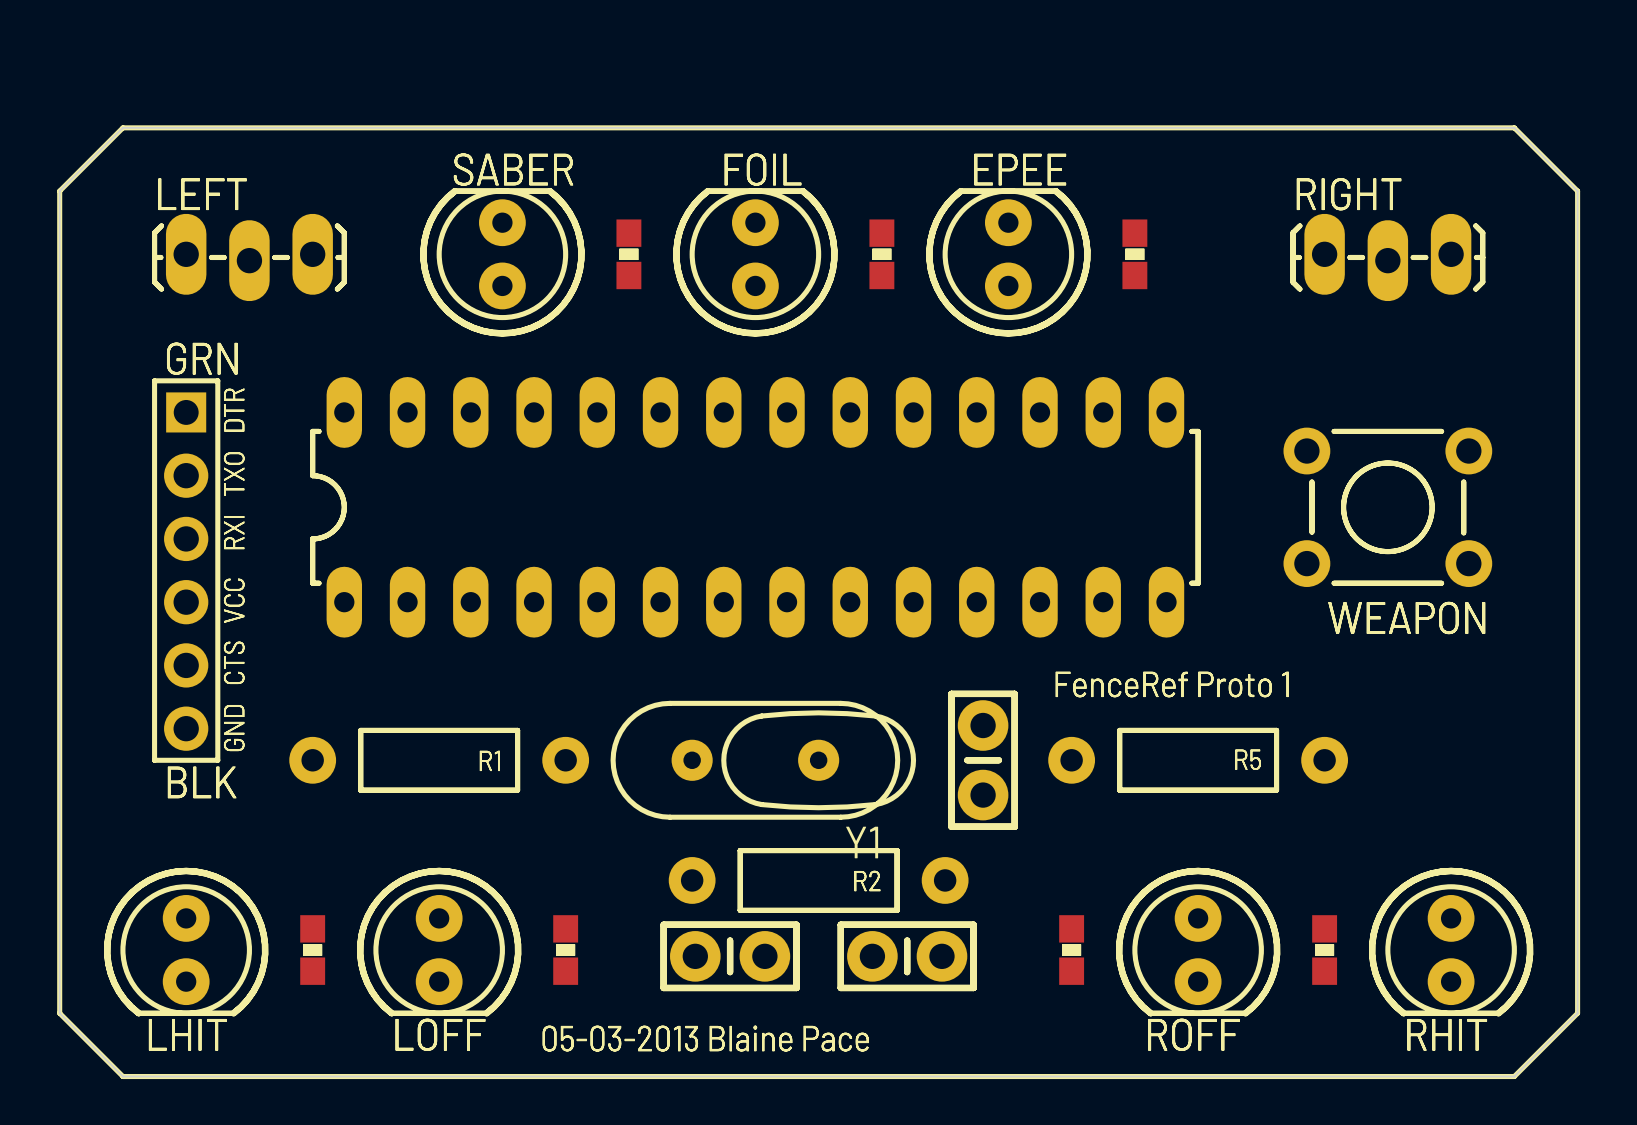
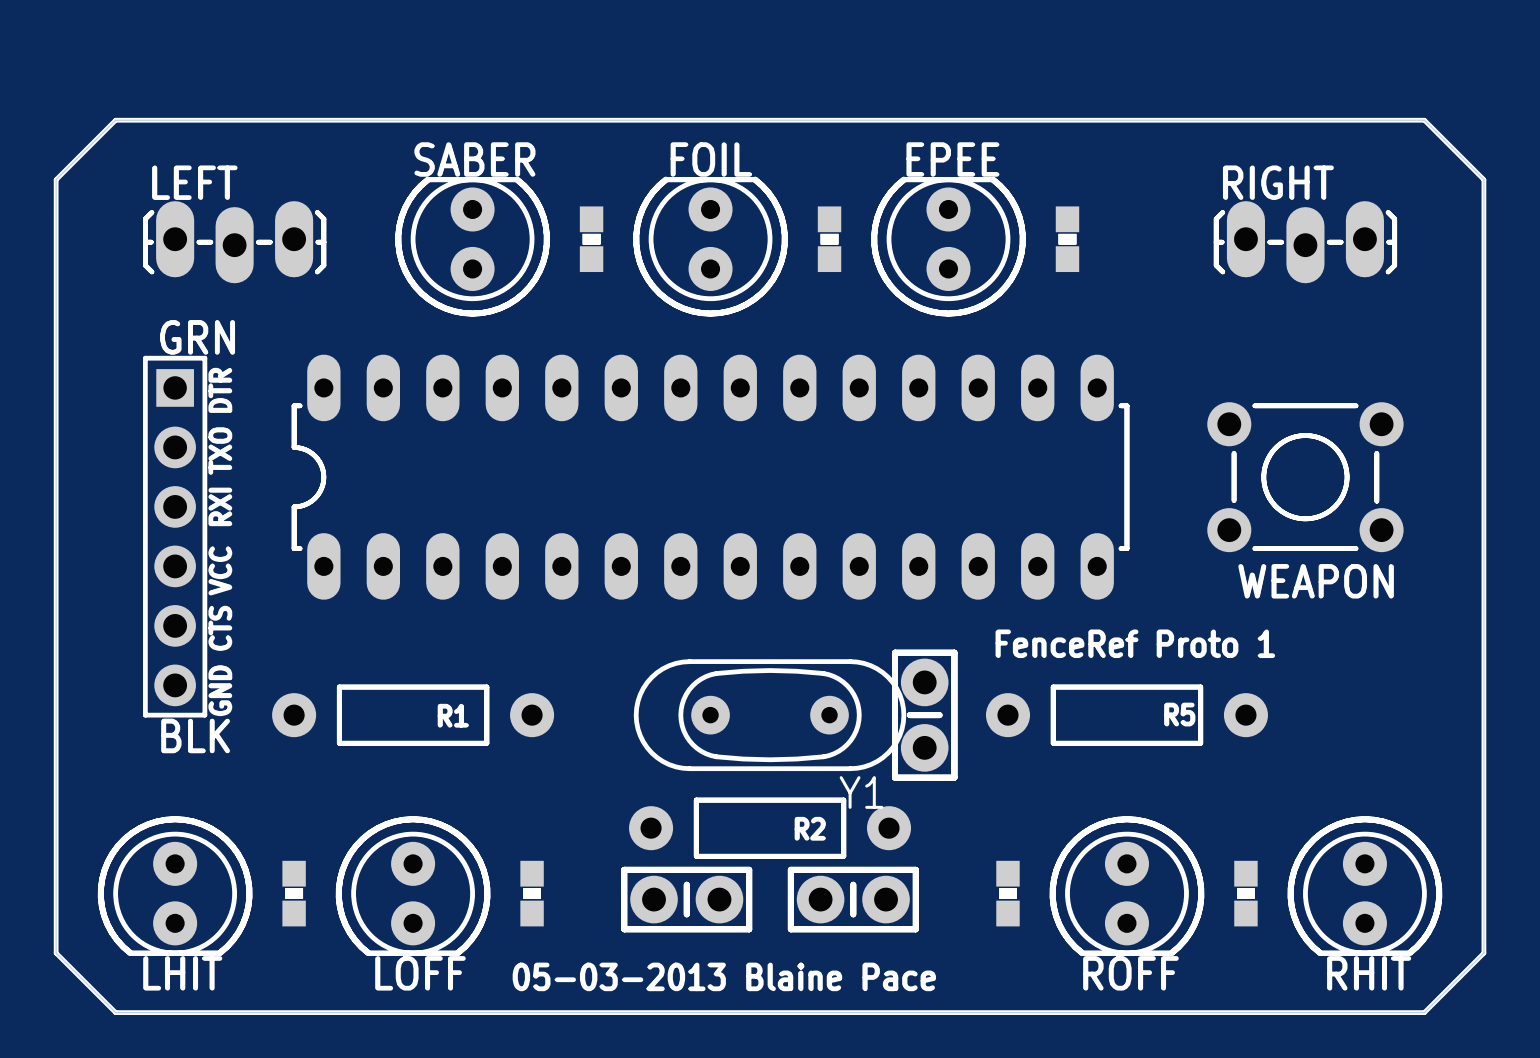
Y1 position: (755, 760) -> (770, 715)

